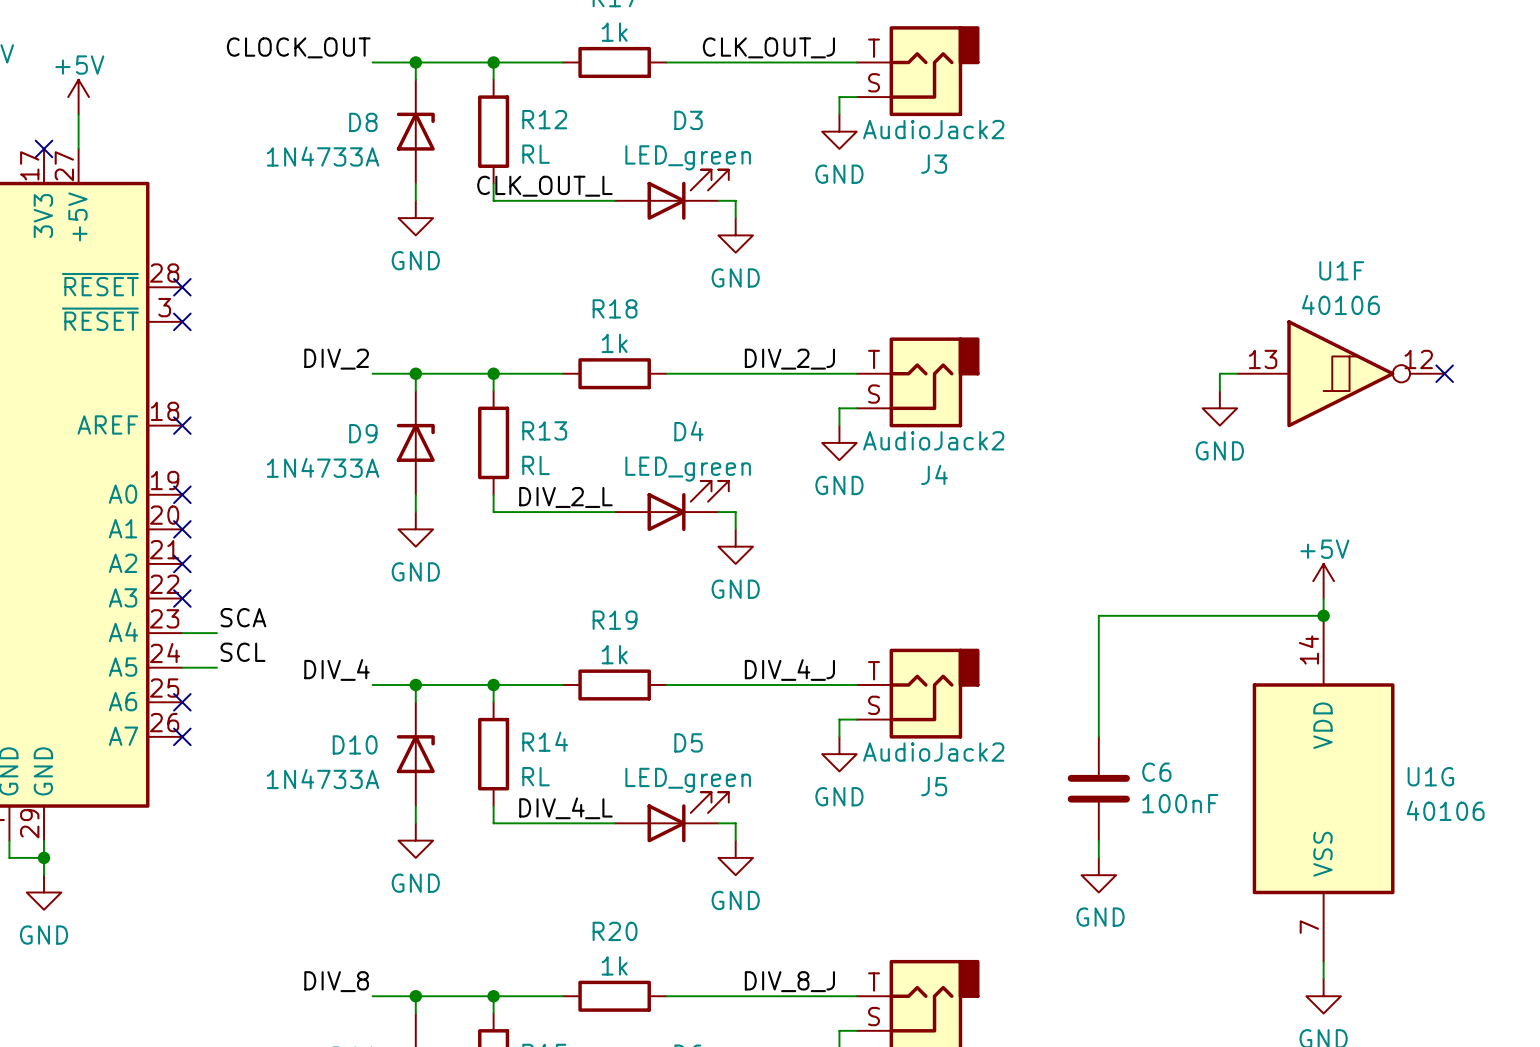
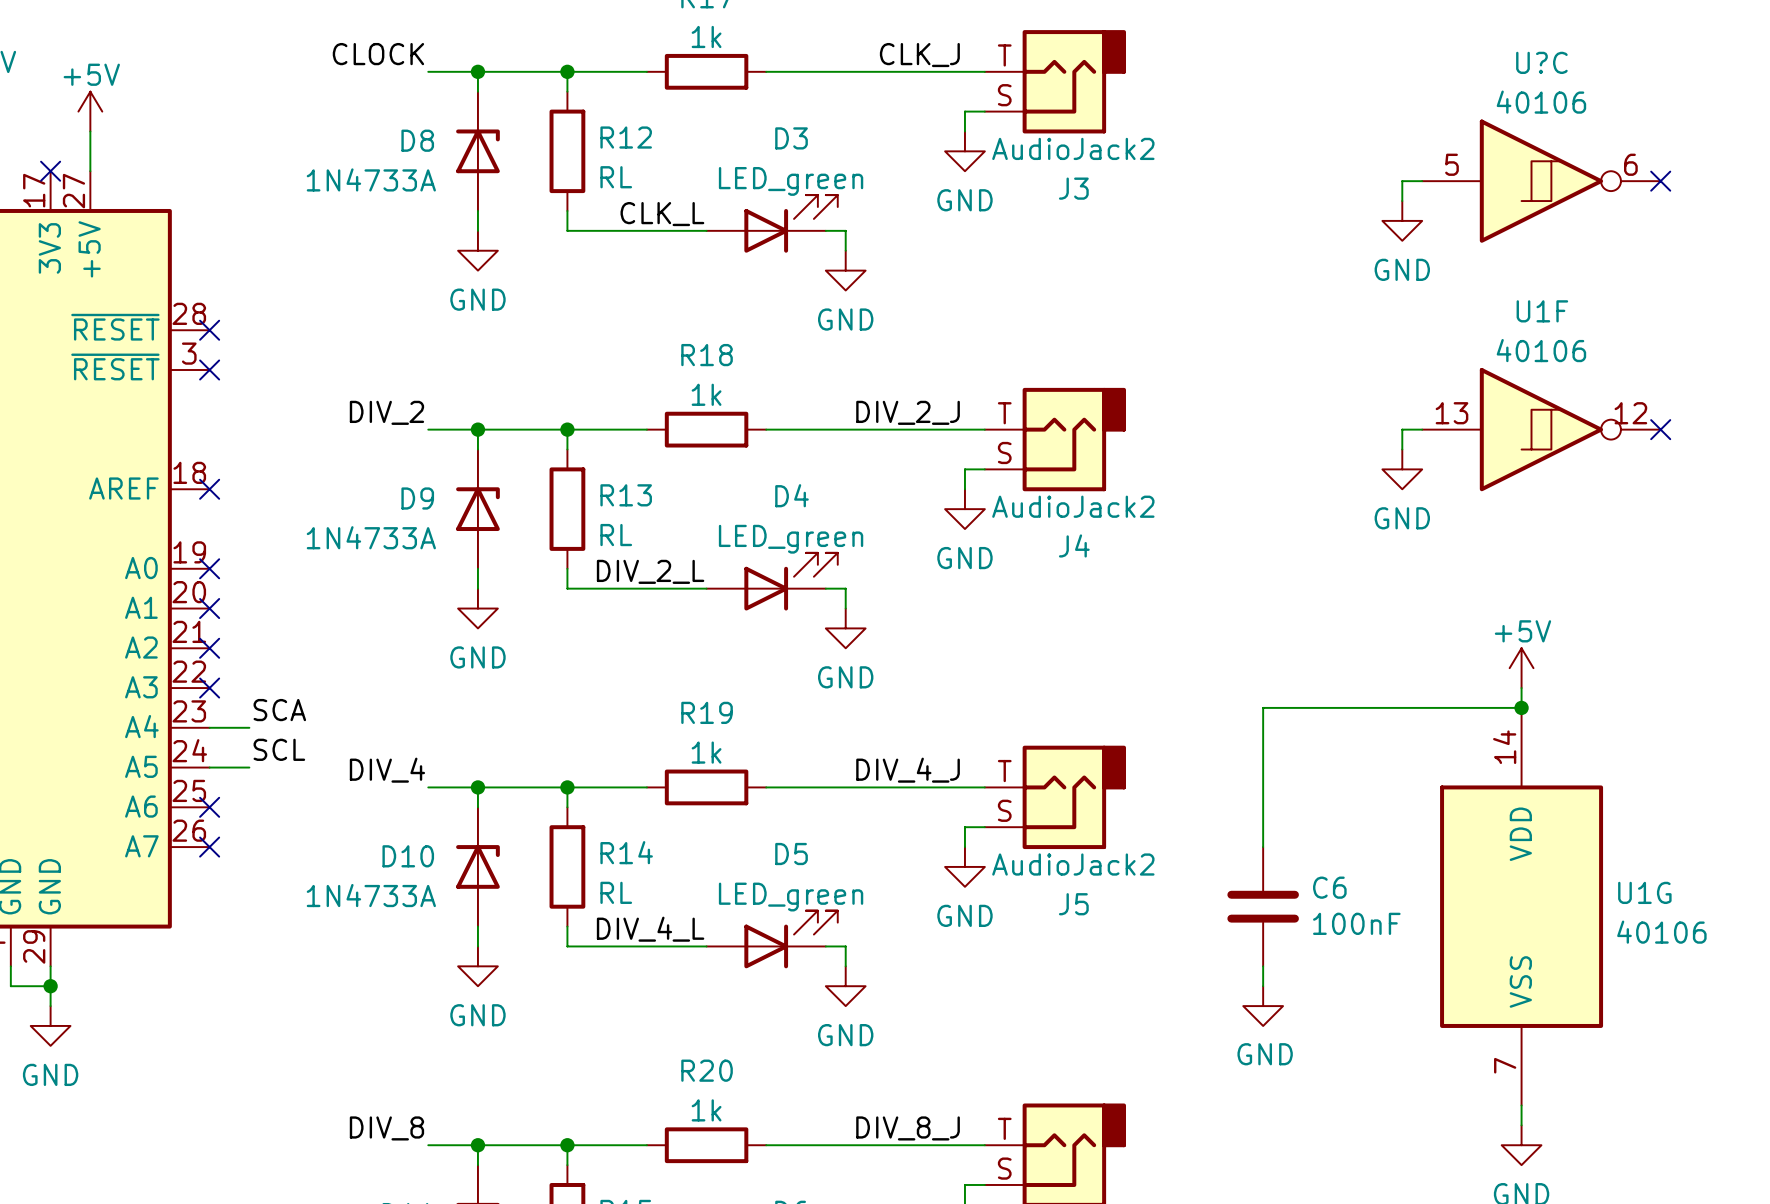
label: CLOCK_OUT (298, 47) -> CLOCK (378, 54)
label: CLK_OUT_J (768, 47) -> CLK_J (919, 55)
wire: none -> (1422, 181) (1402, 181) (1402, 201)
U?C: none -> 40106 (1541, 181)
no-connect mark: none -> (1660, 181)
label: CLK_OUT_L (544, 186) -> CLK_L (662, 214)
power symbol: none -> GND (1402, 220)

